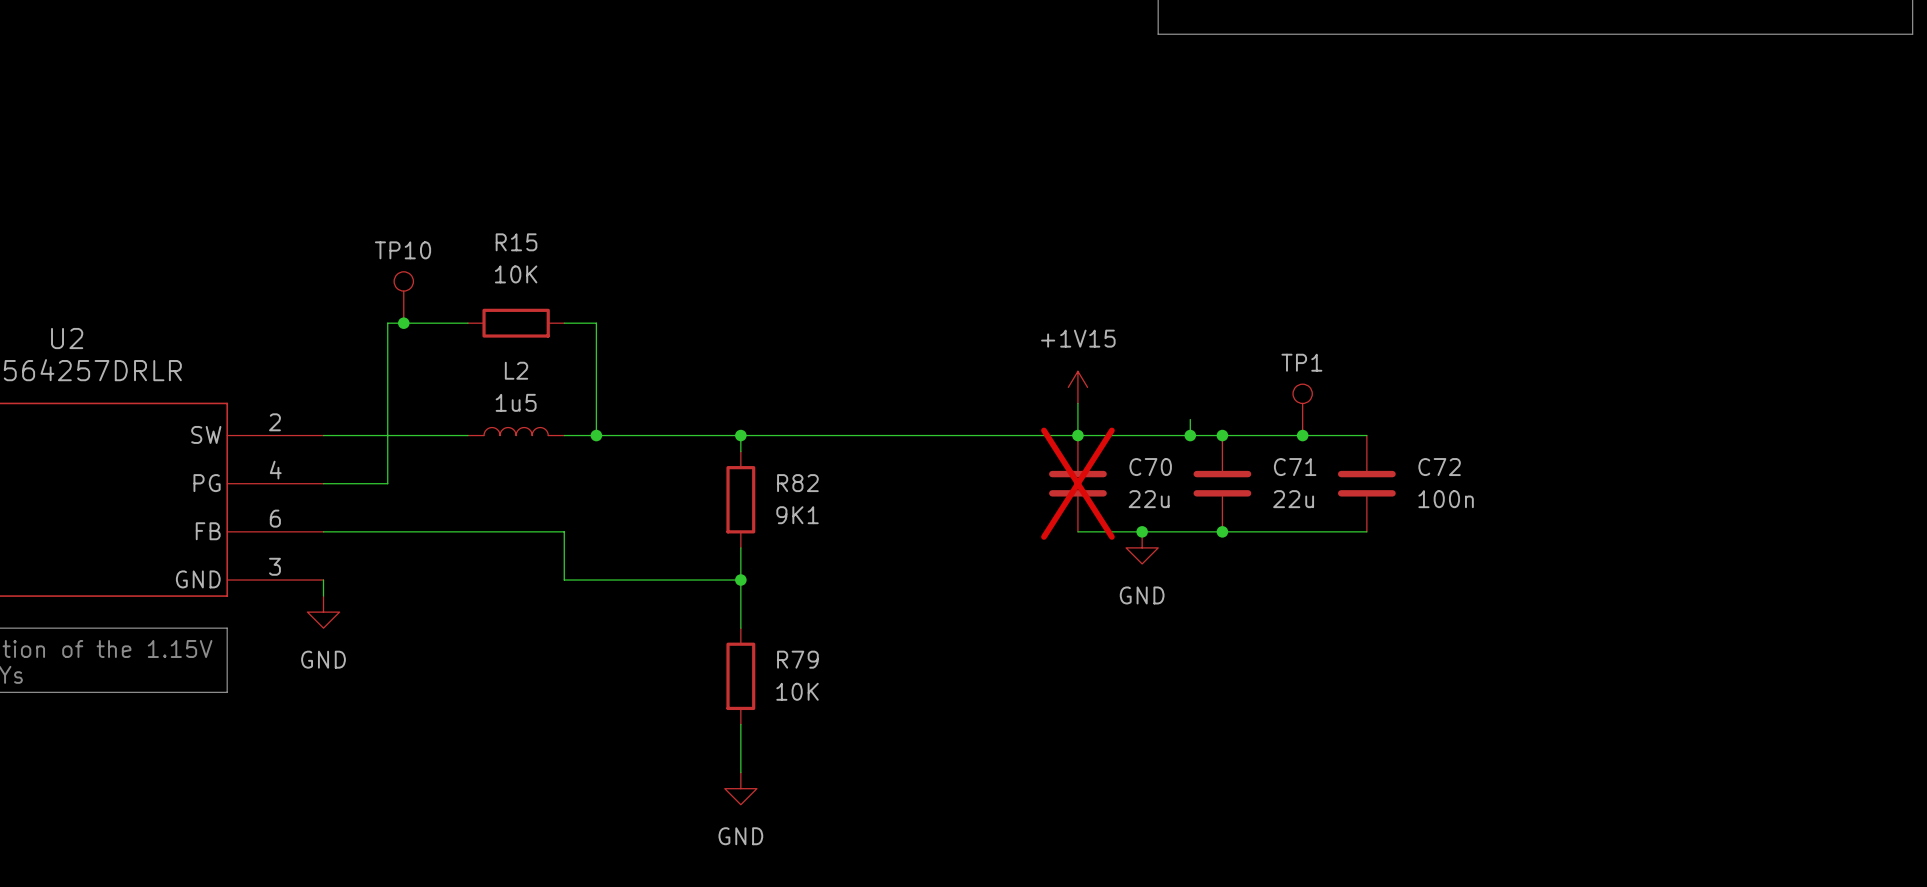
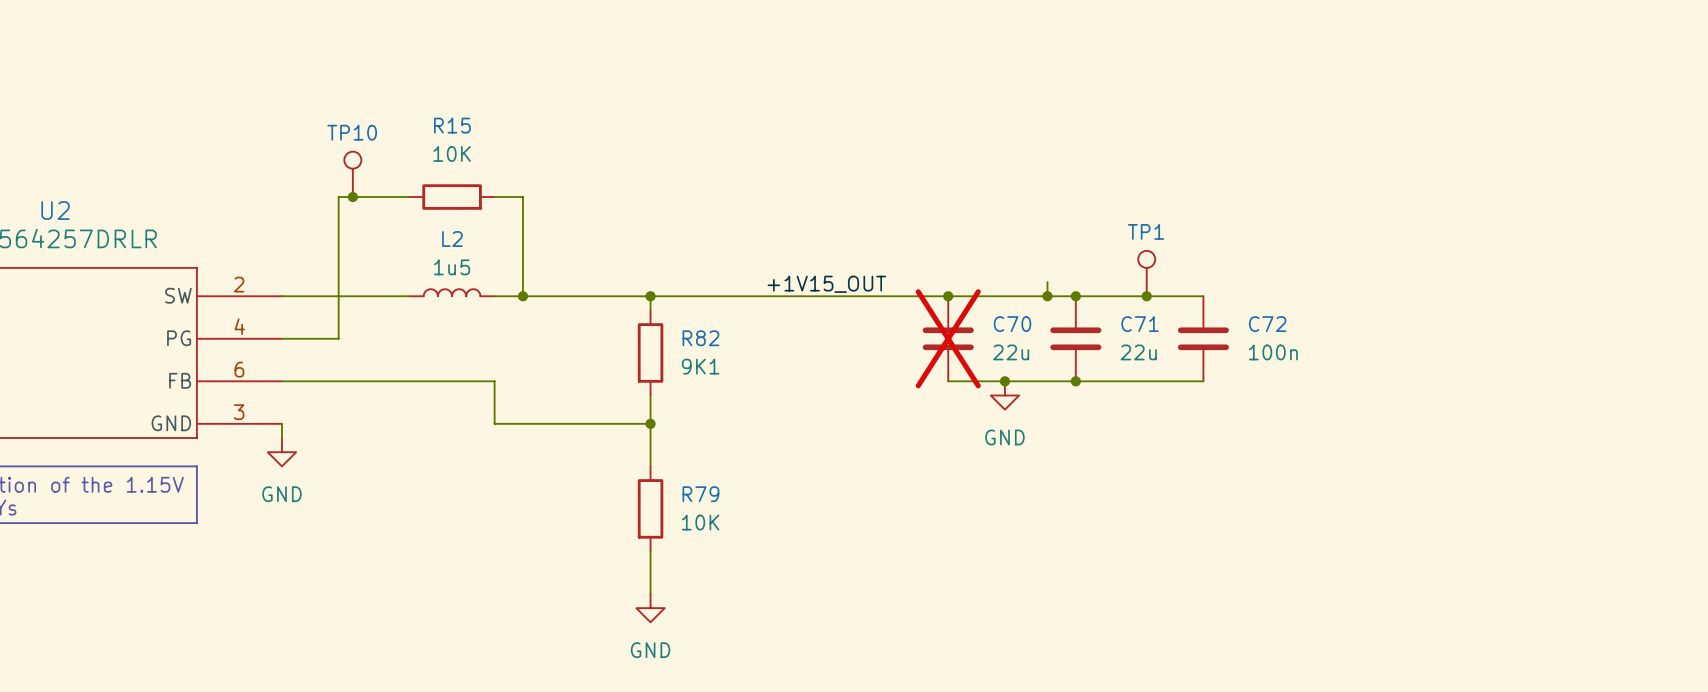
power symbol: +1V15 (1077, 387) -> none
wire: (1077, 403) (1077, 435) -> none
label: none -> +1V15_OUT (826, 284)

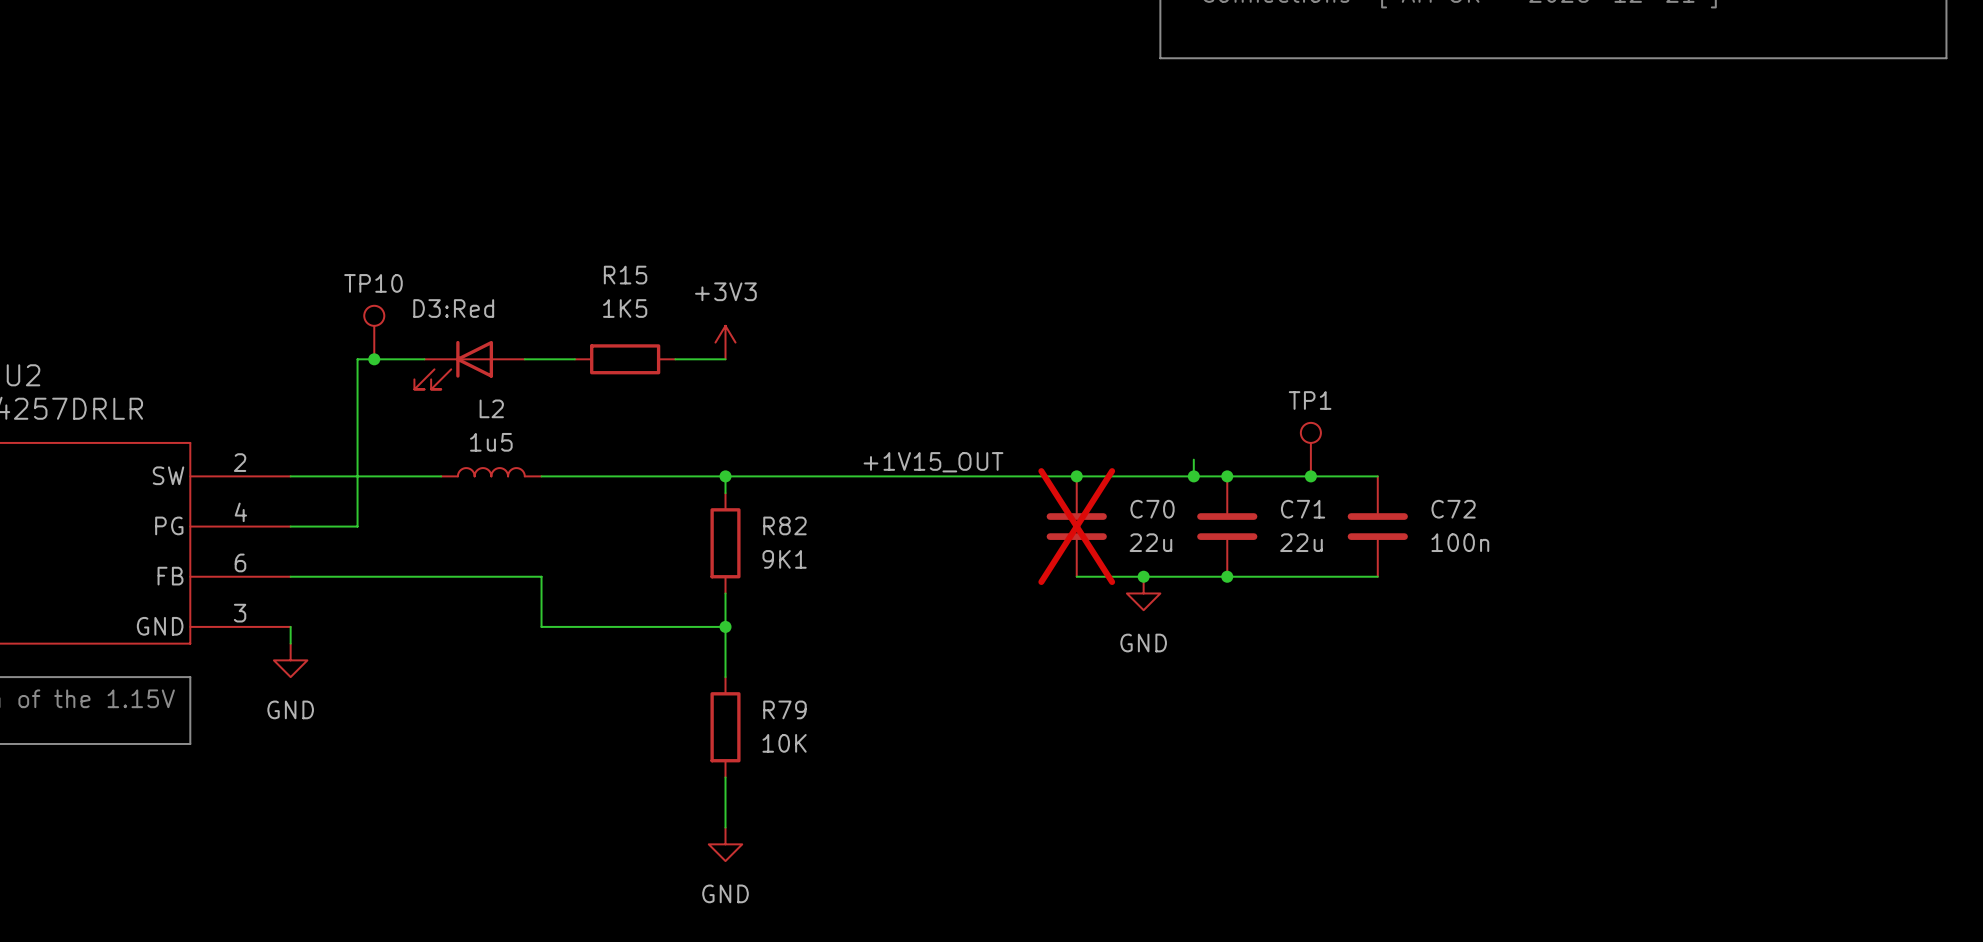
R15 value: 10K (452, 153) -> 1K5 (625, 308)
power symbol: none -> +3V3 (725, 342)
R15 position: (452, 197) -> (625, 359)
wire: (522, 197) (522, 296) -> none
wire: none -> (675, 359) (725, 359)
part: none -> (469, 365)
junction: (522, 296) -> none

